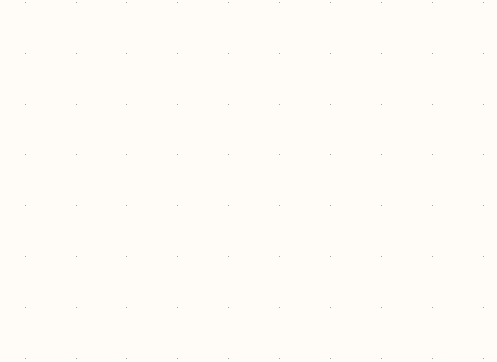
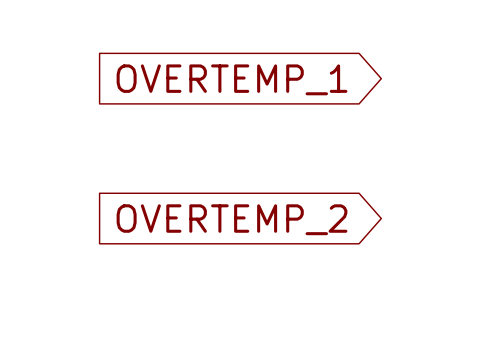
global label: none -> OVERTEMP_1 (232, 79)
global label: none -> OVERTEMP_2 (232, 219)

